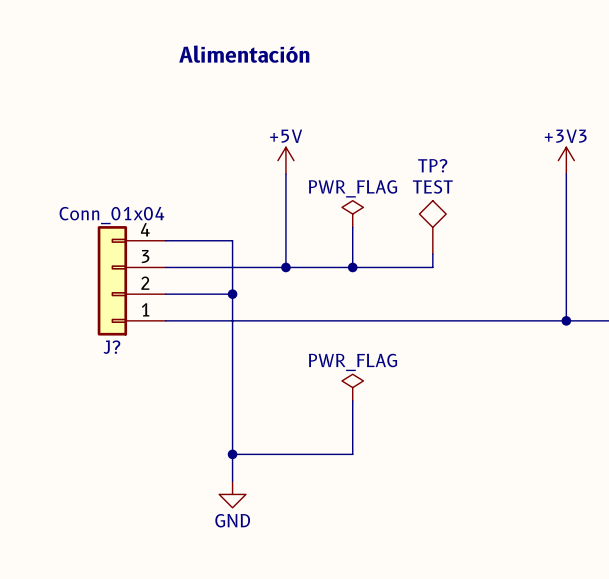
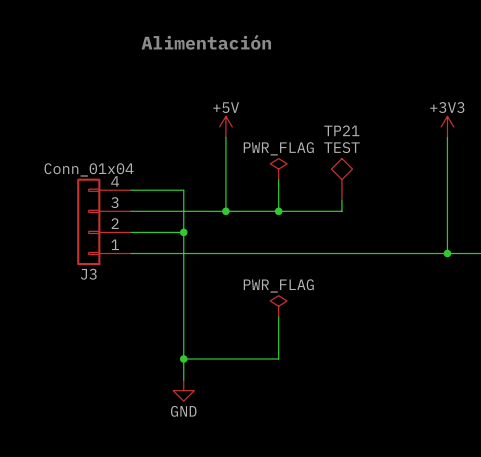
TP? name: TP? (432, 165) -> TP21 (341, 130)
J? name: J? (111, 347) -> J3 (88, 274)

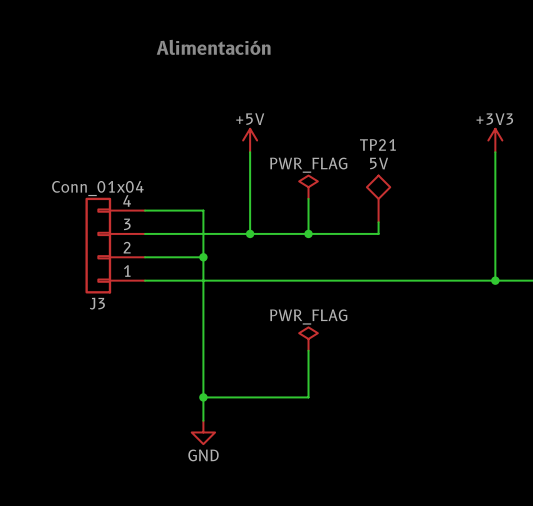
TP21 value: TEST (341, 147) -> 5V (379, 163)

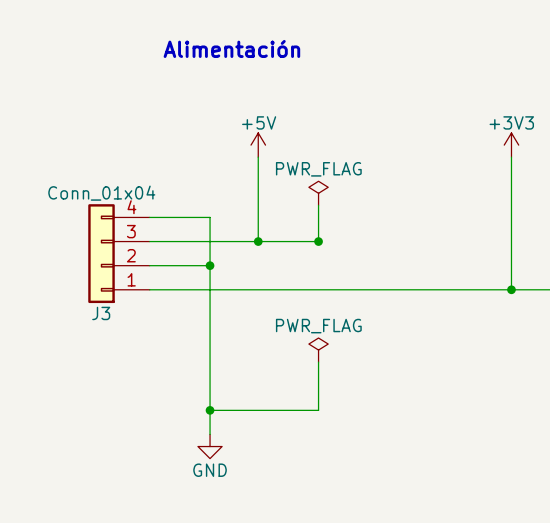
TP21: 5V (378, 198) -> none
wire: (378, 222) (378, 233) (308, 233) -> none

